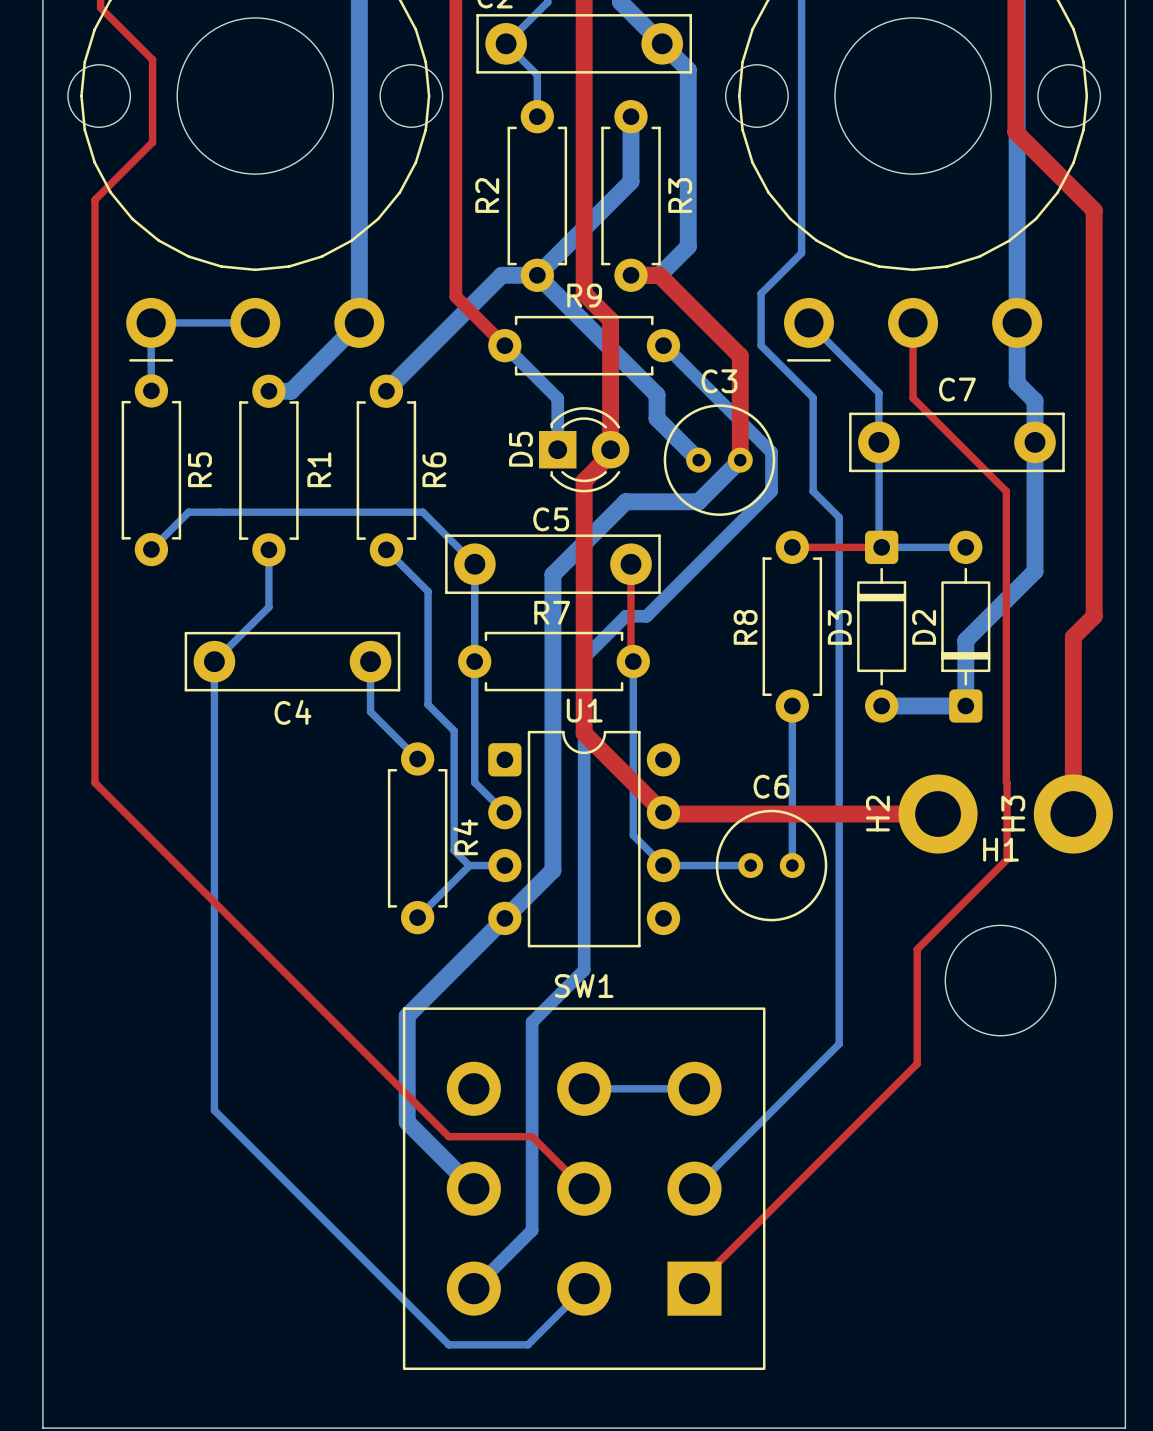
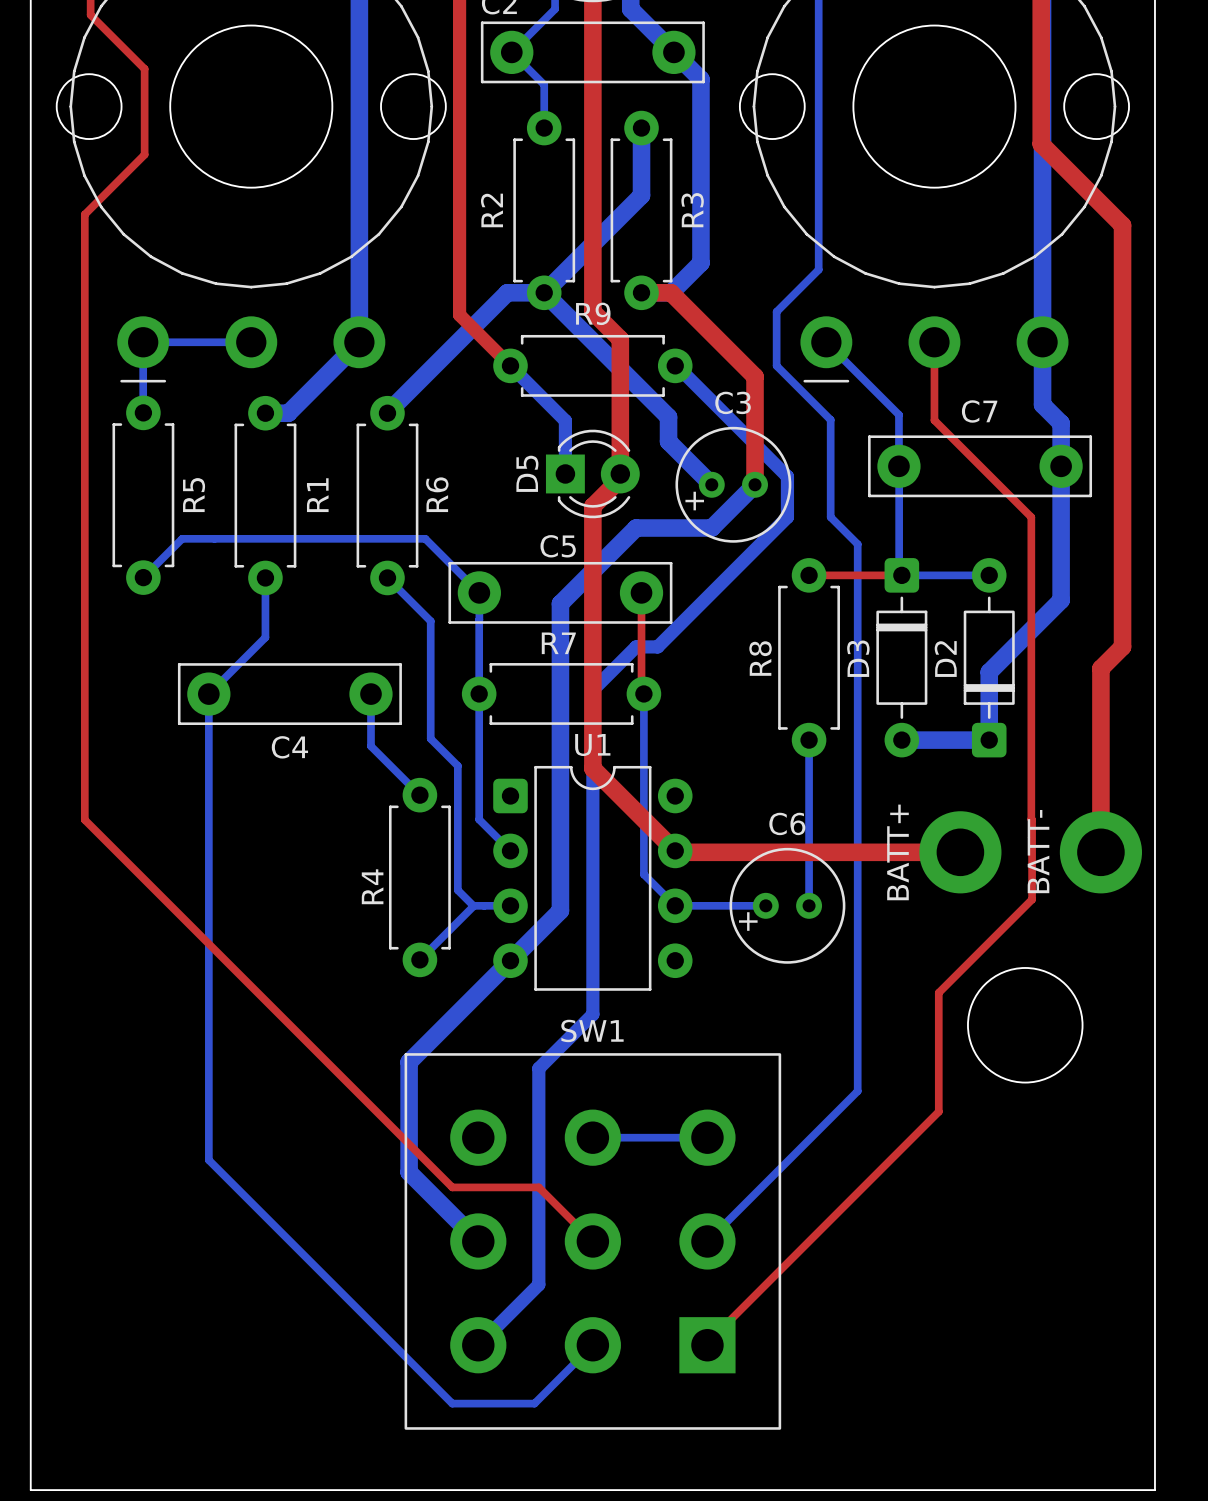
text: none -> + (694, 501)
H2 name: H2 (877, 813) -> BATT+ (897, 852)
H3 name: H3 (1013, 813) -> BATT- (1038, 851)
R4 name position: R4 (465, 837) -> R4 (372, 886)
H1 name: H1 (1000, 849) -> none
text: none -> + (748, 921)

